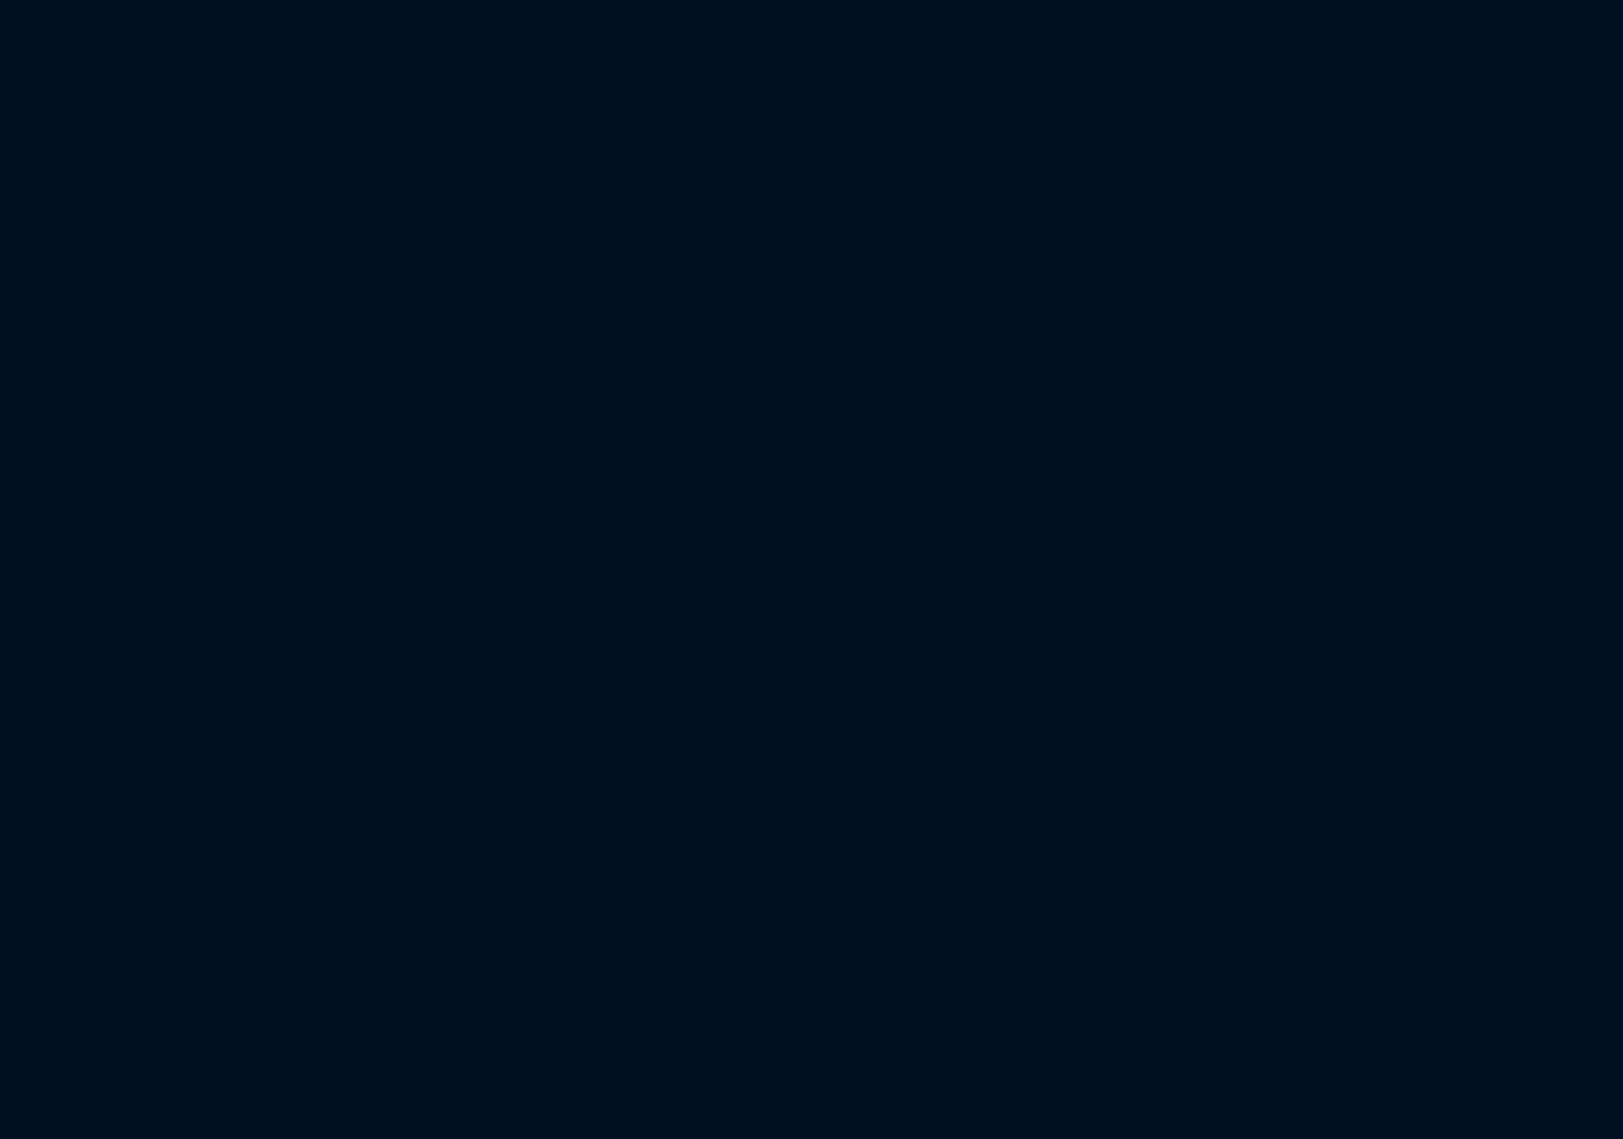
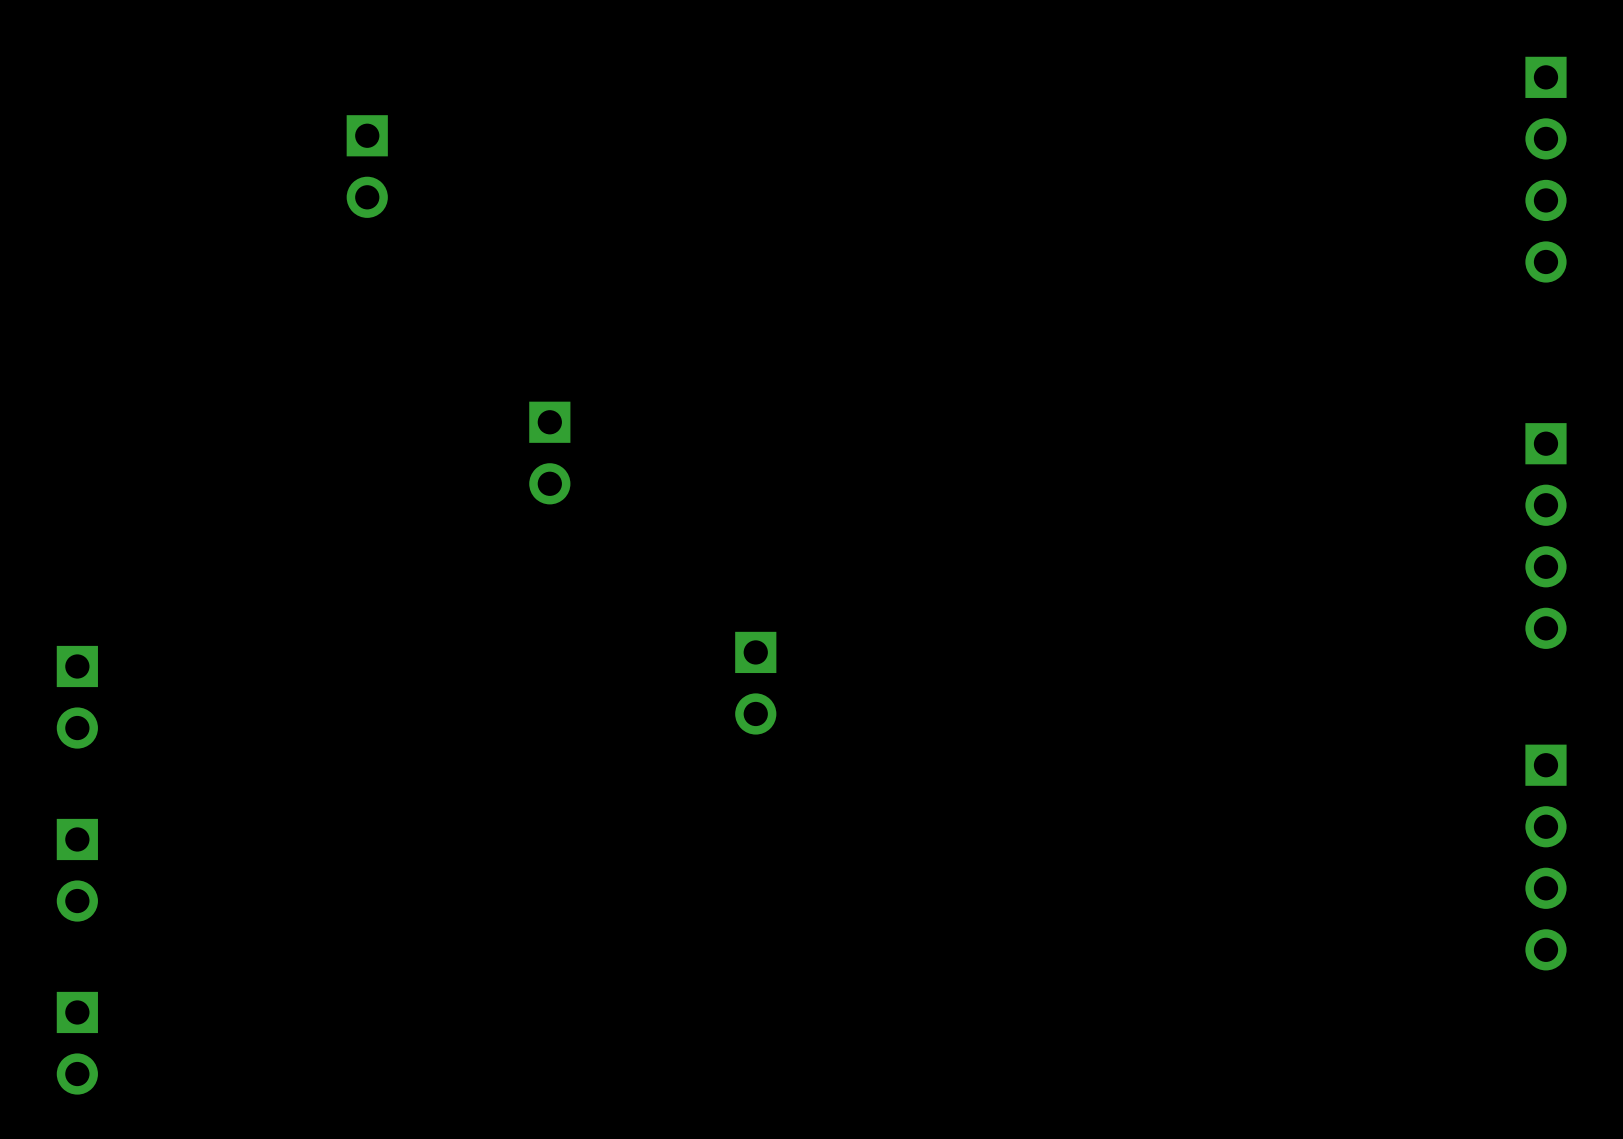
part: none -> (367, 166)
part: none -> (1545, 169)
part: none -> (549, 453)
part: none -> (1545, 536)
part: none -> (755, 683)
part: none -> (77, 697)
part: none -> (1545, 857)
part: none -> (77, 870)
part: none -> (77, 1043)

